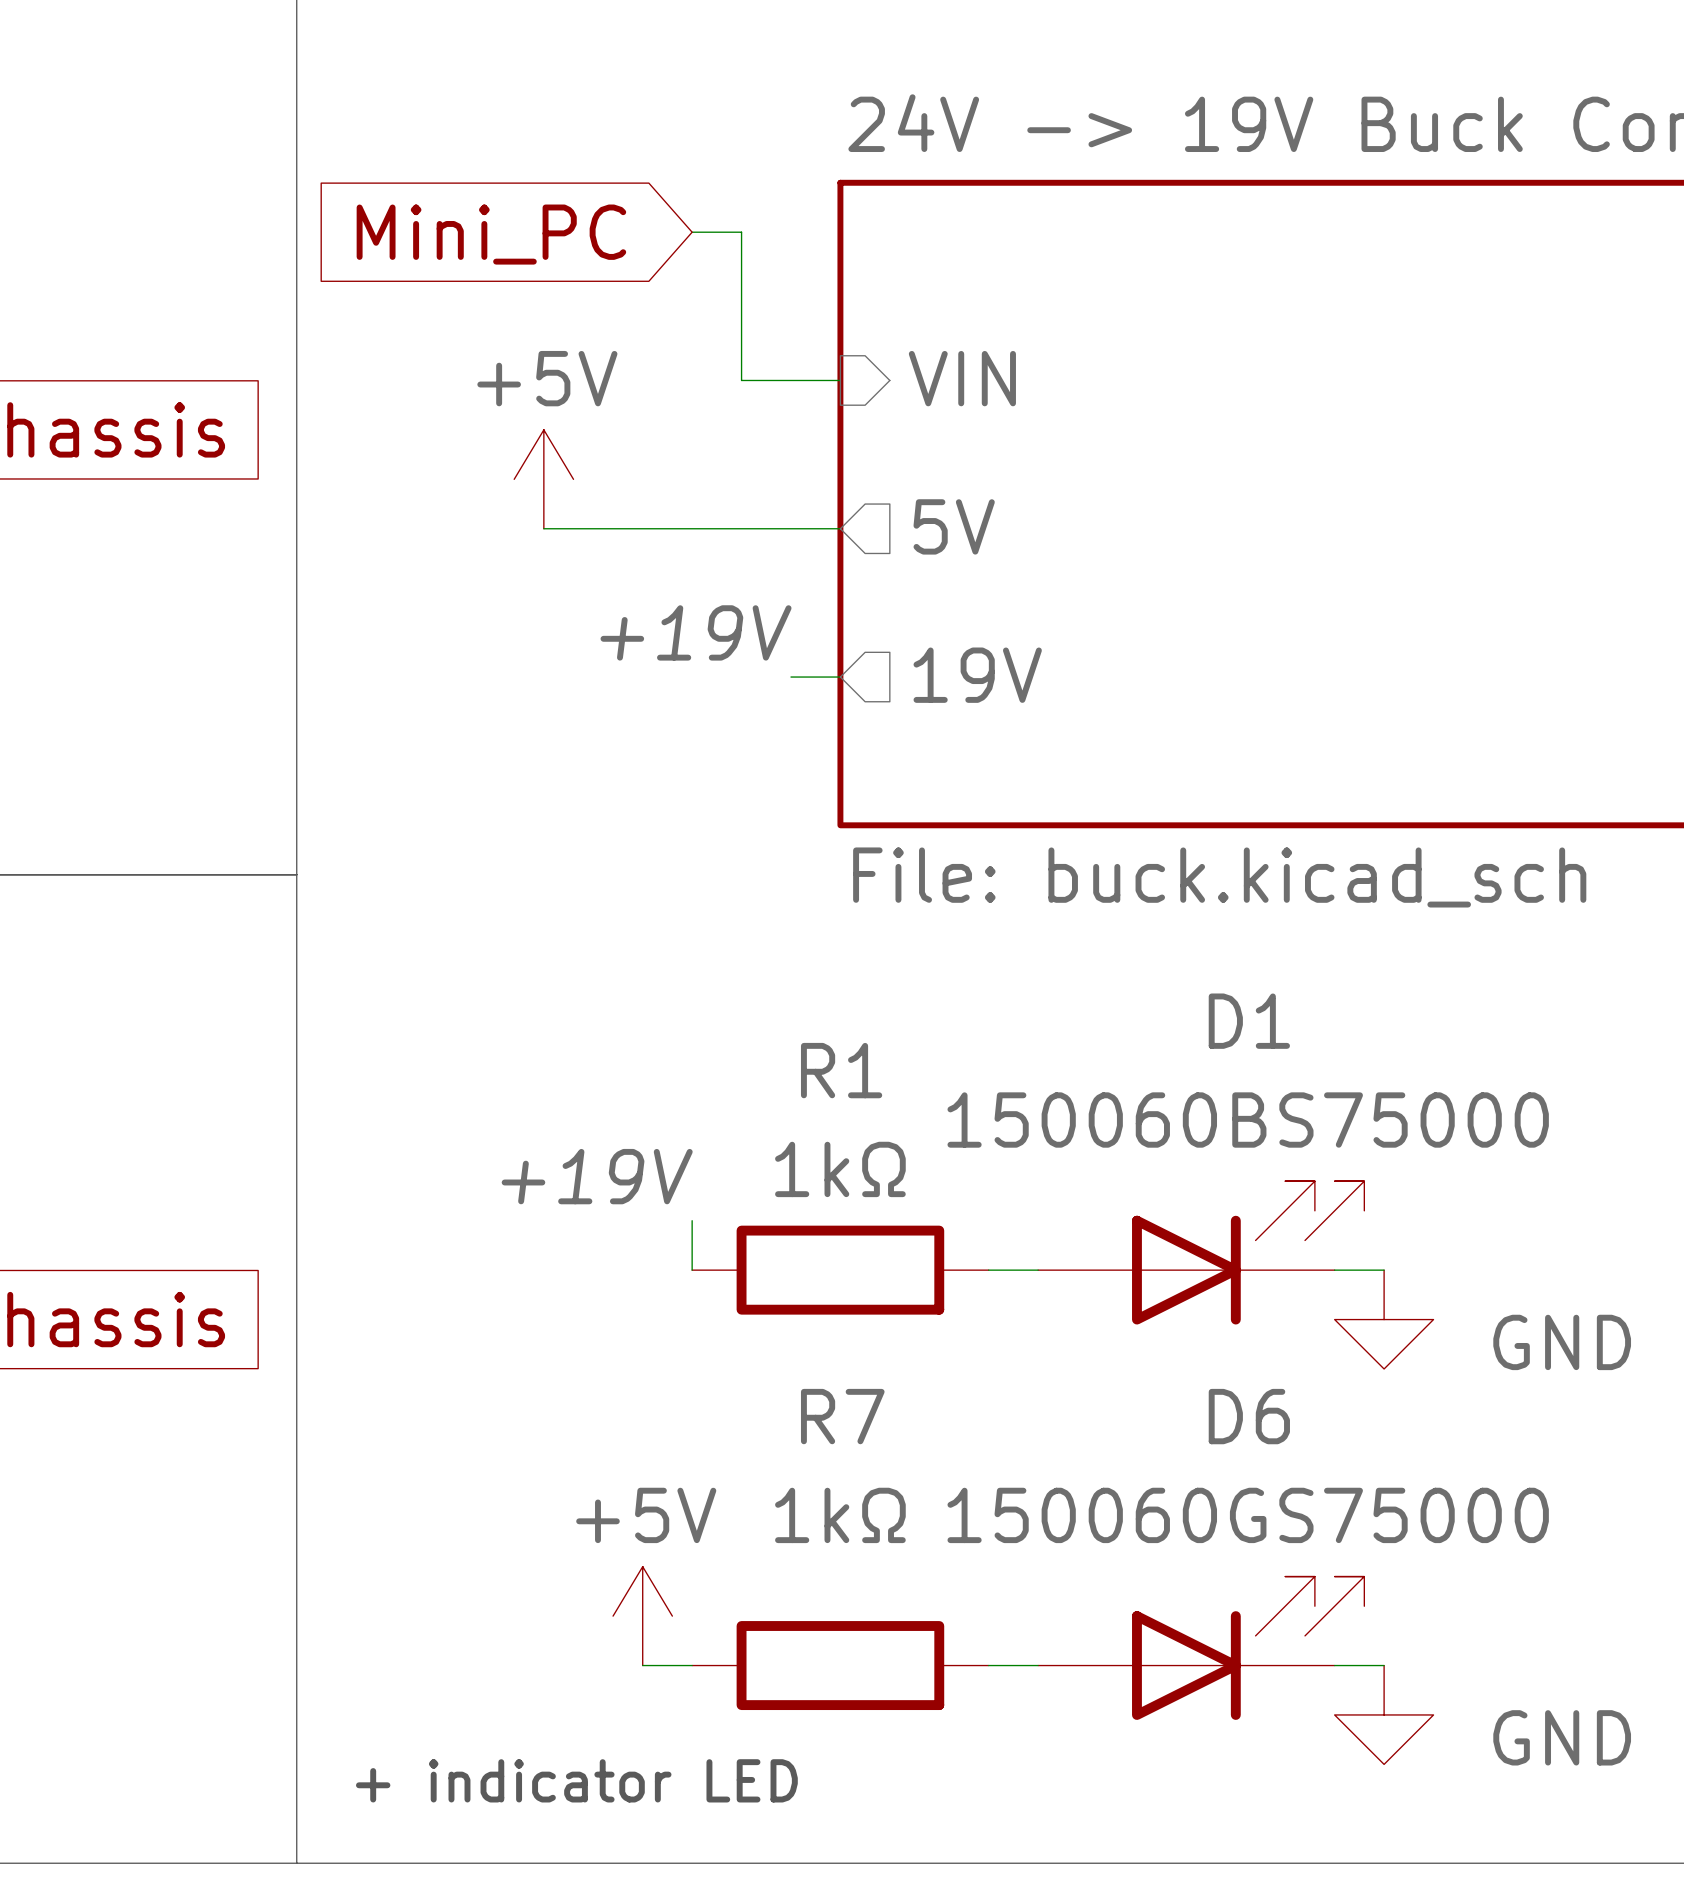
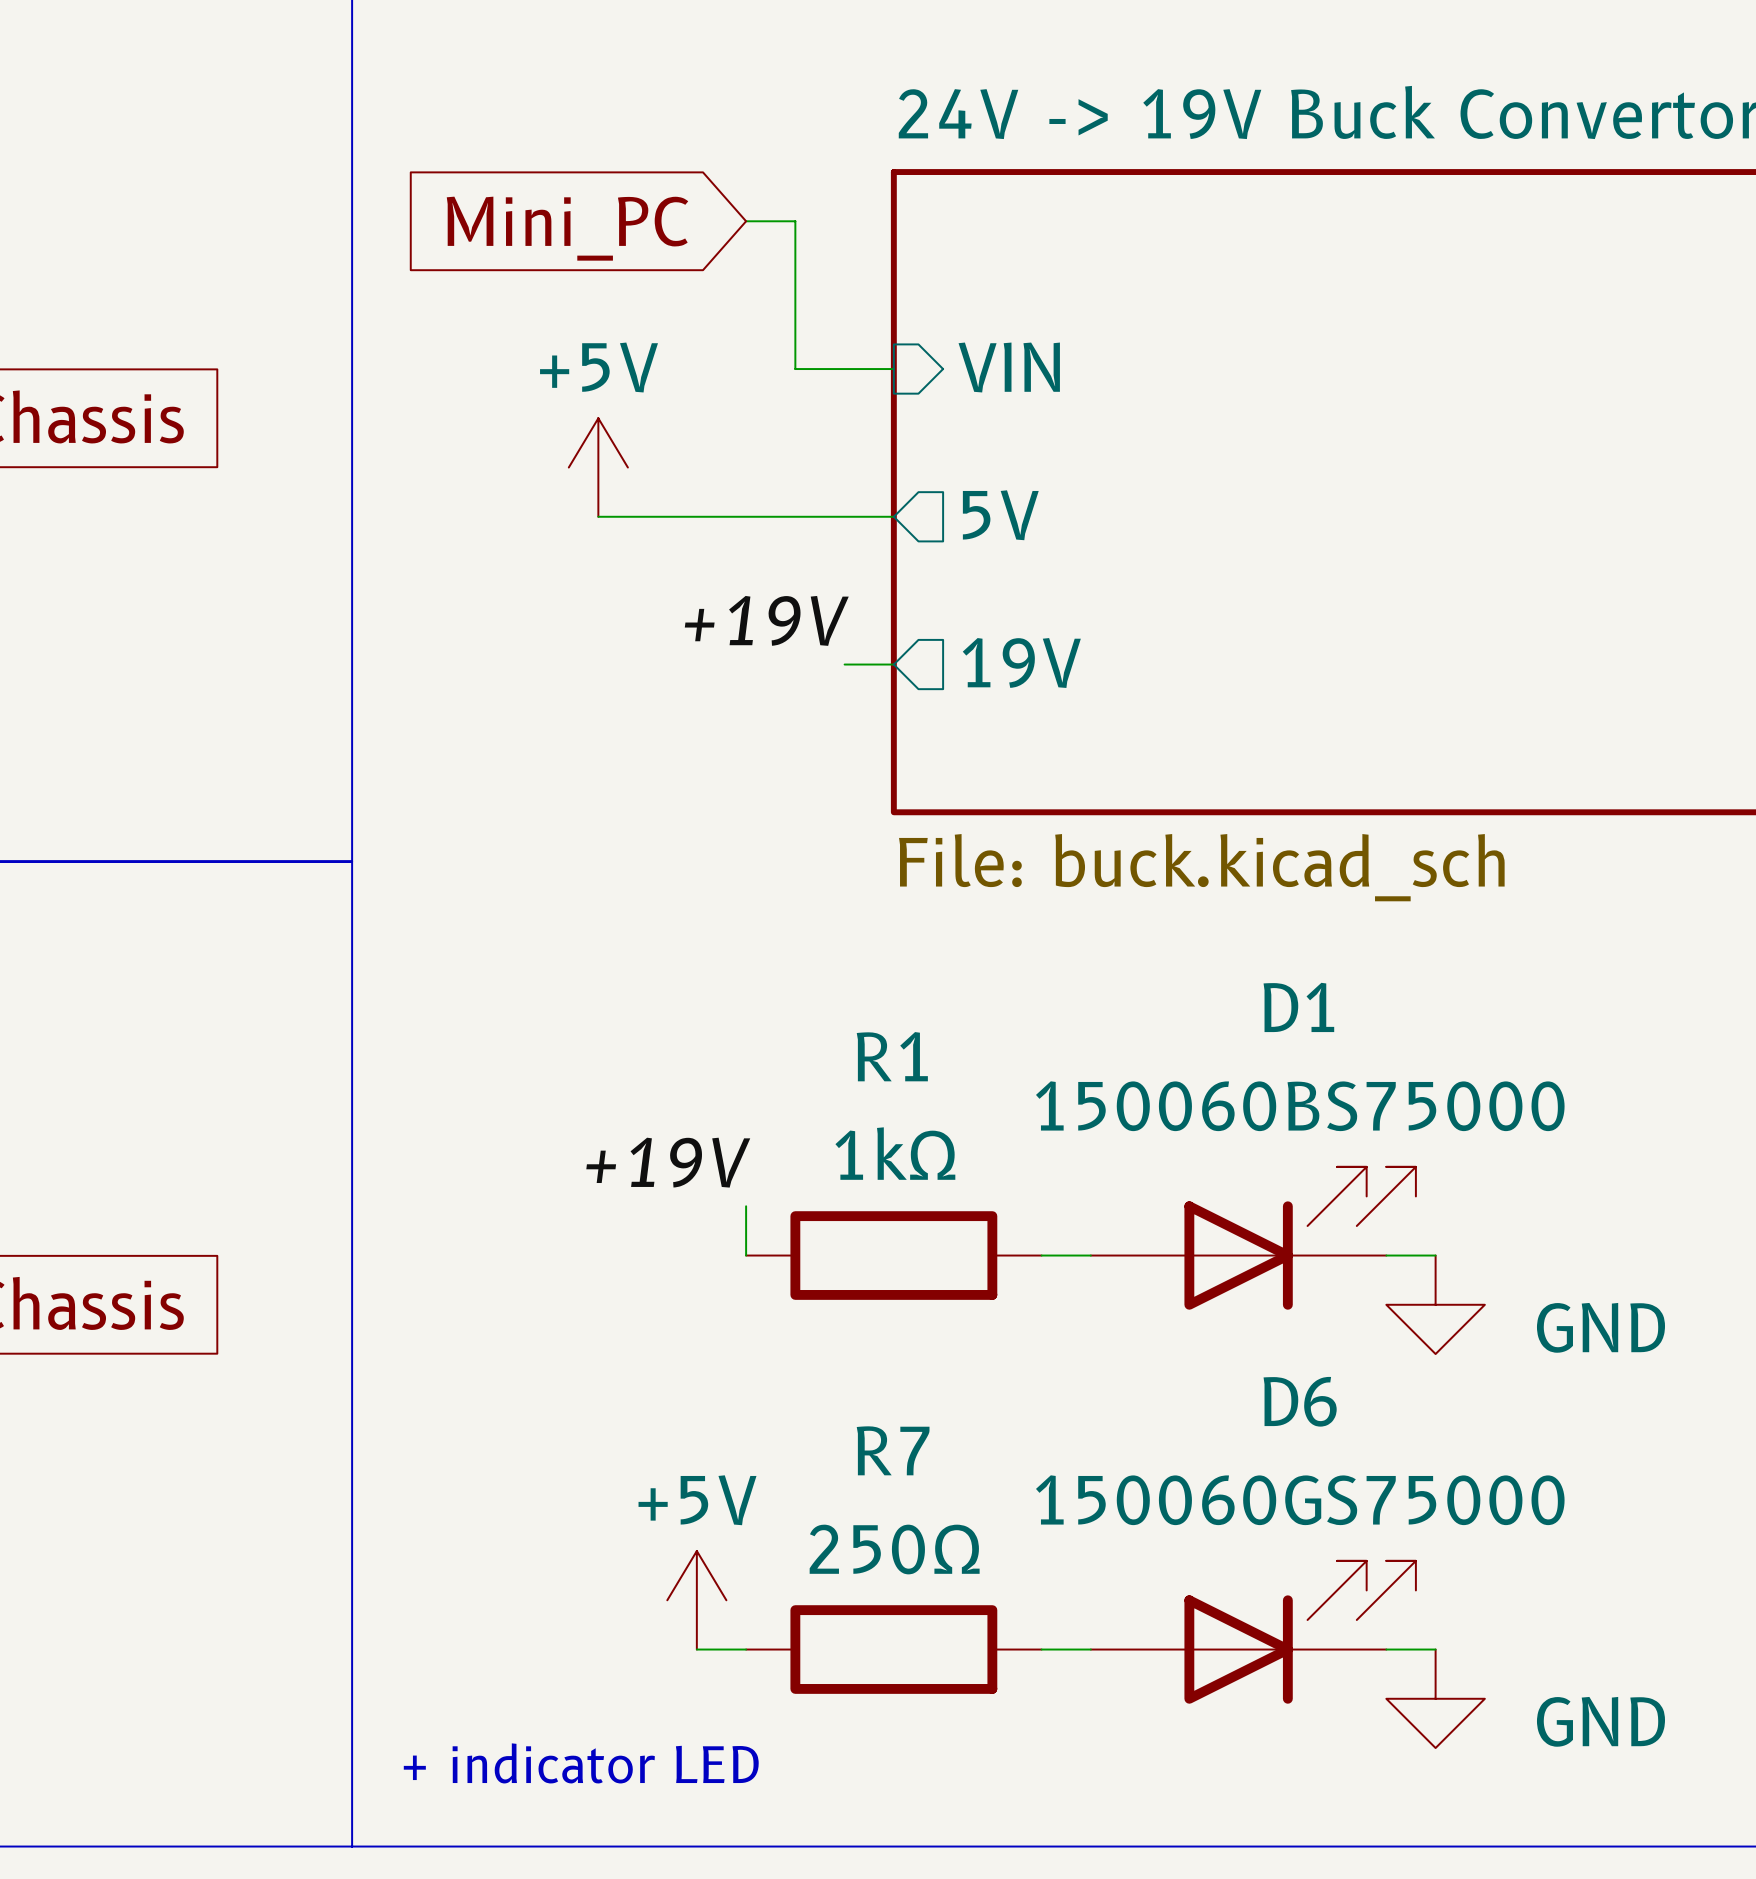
R7 name position: R7 (842, 1416) -> R7 (893, 1450)
R7 value: 1kΩ (840, 1515) -> 250Ω (894, 1549)

